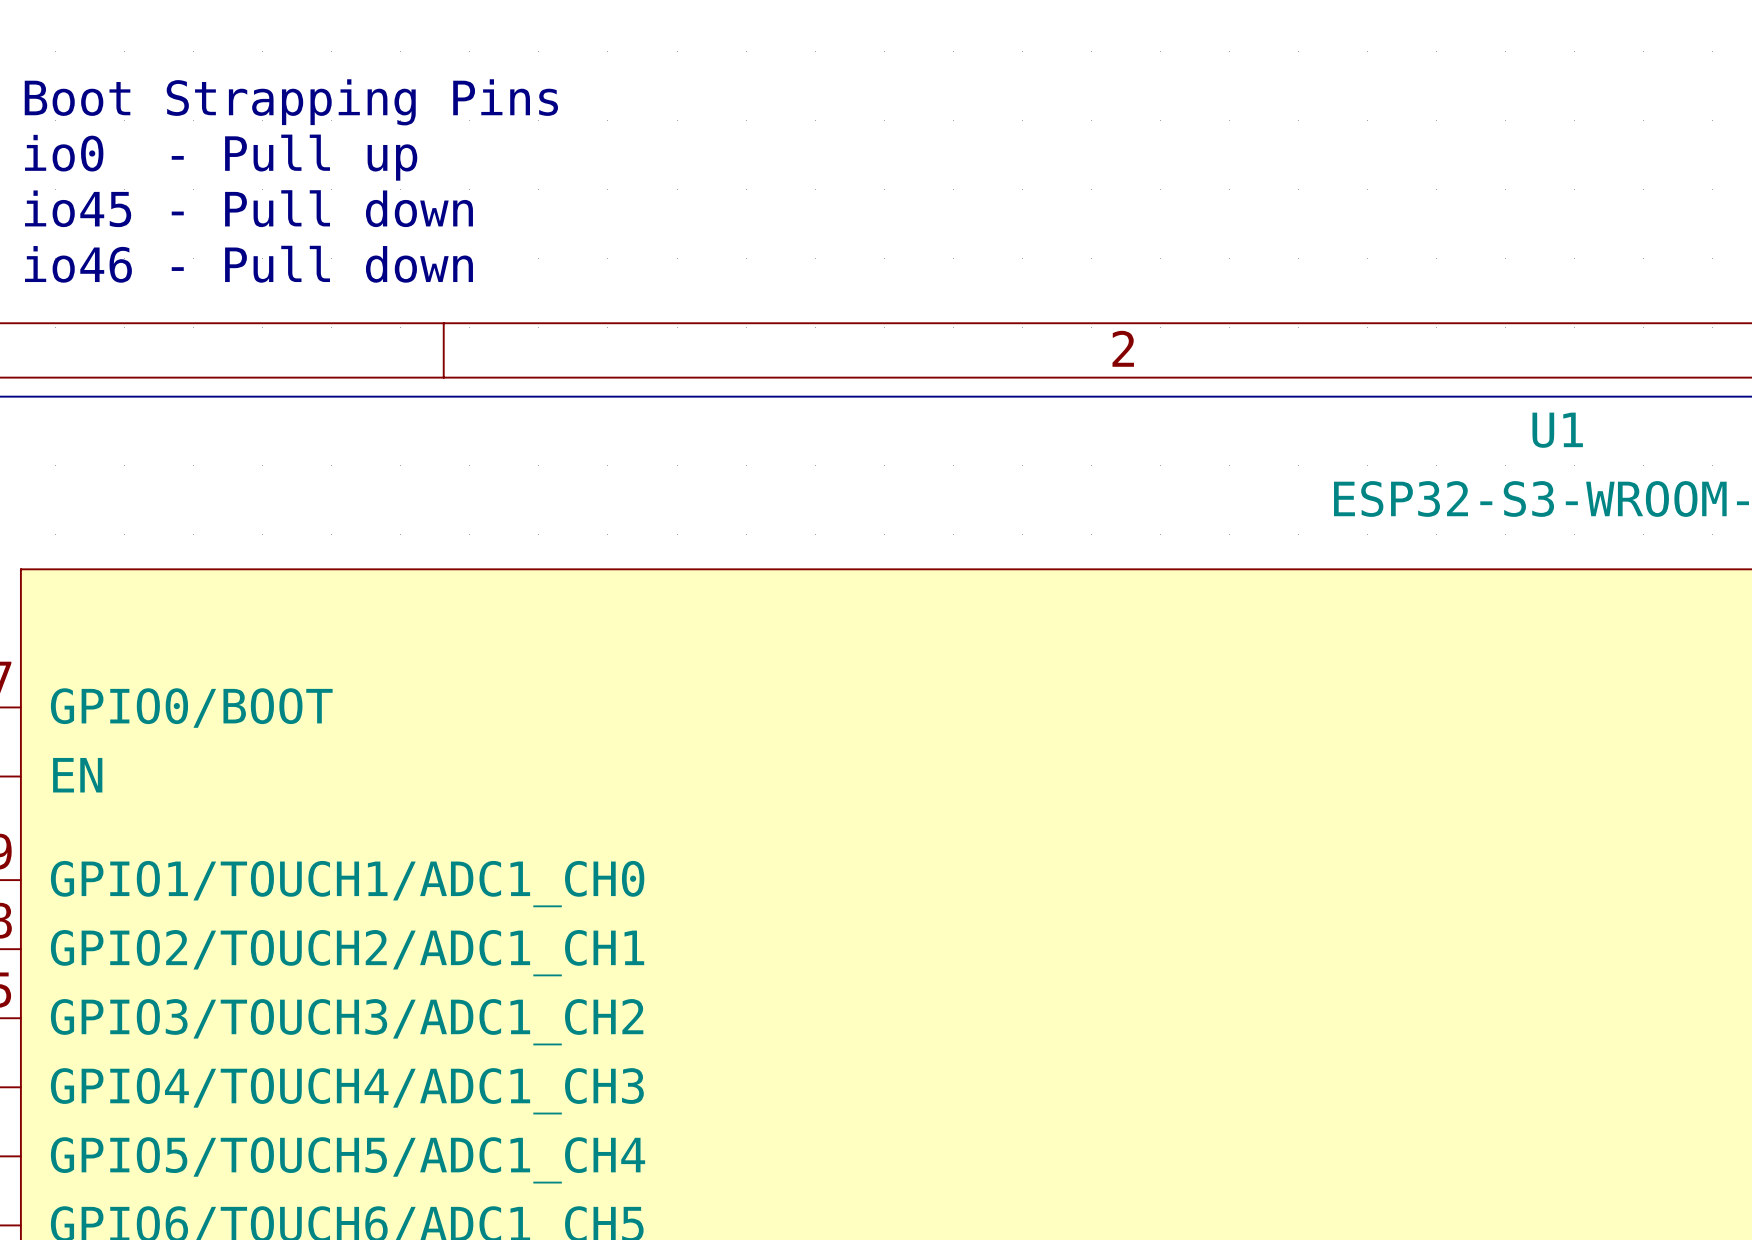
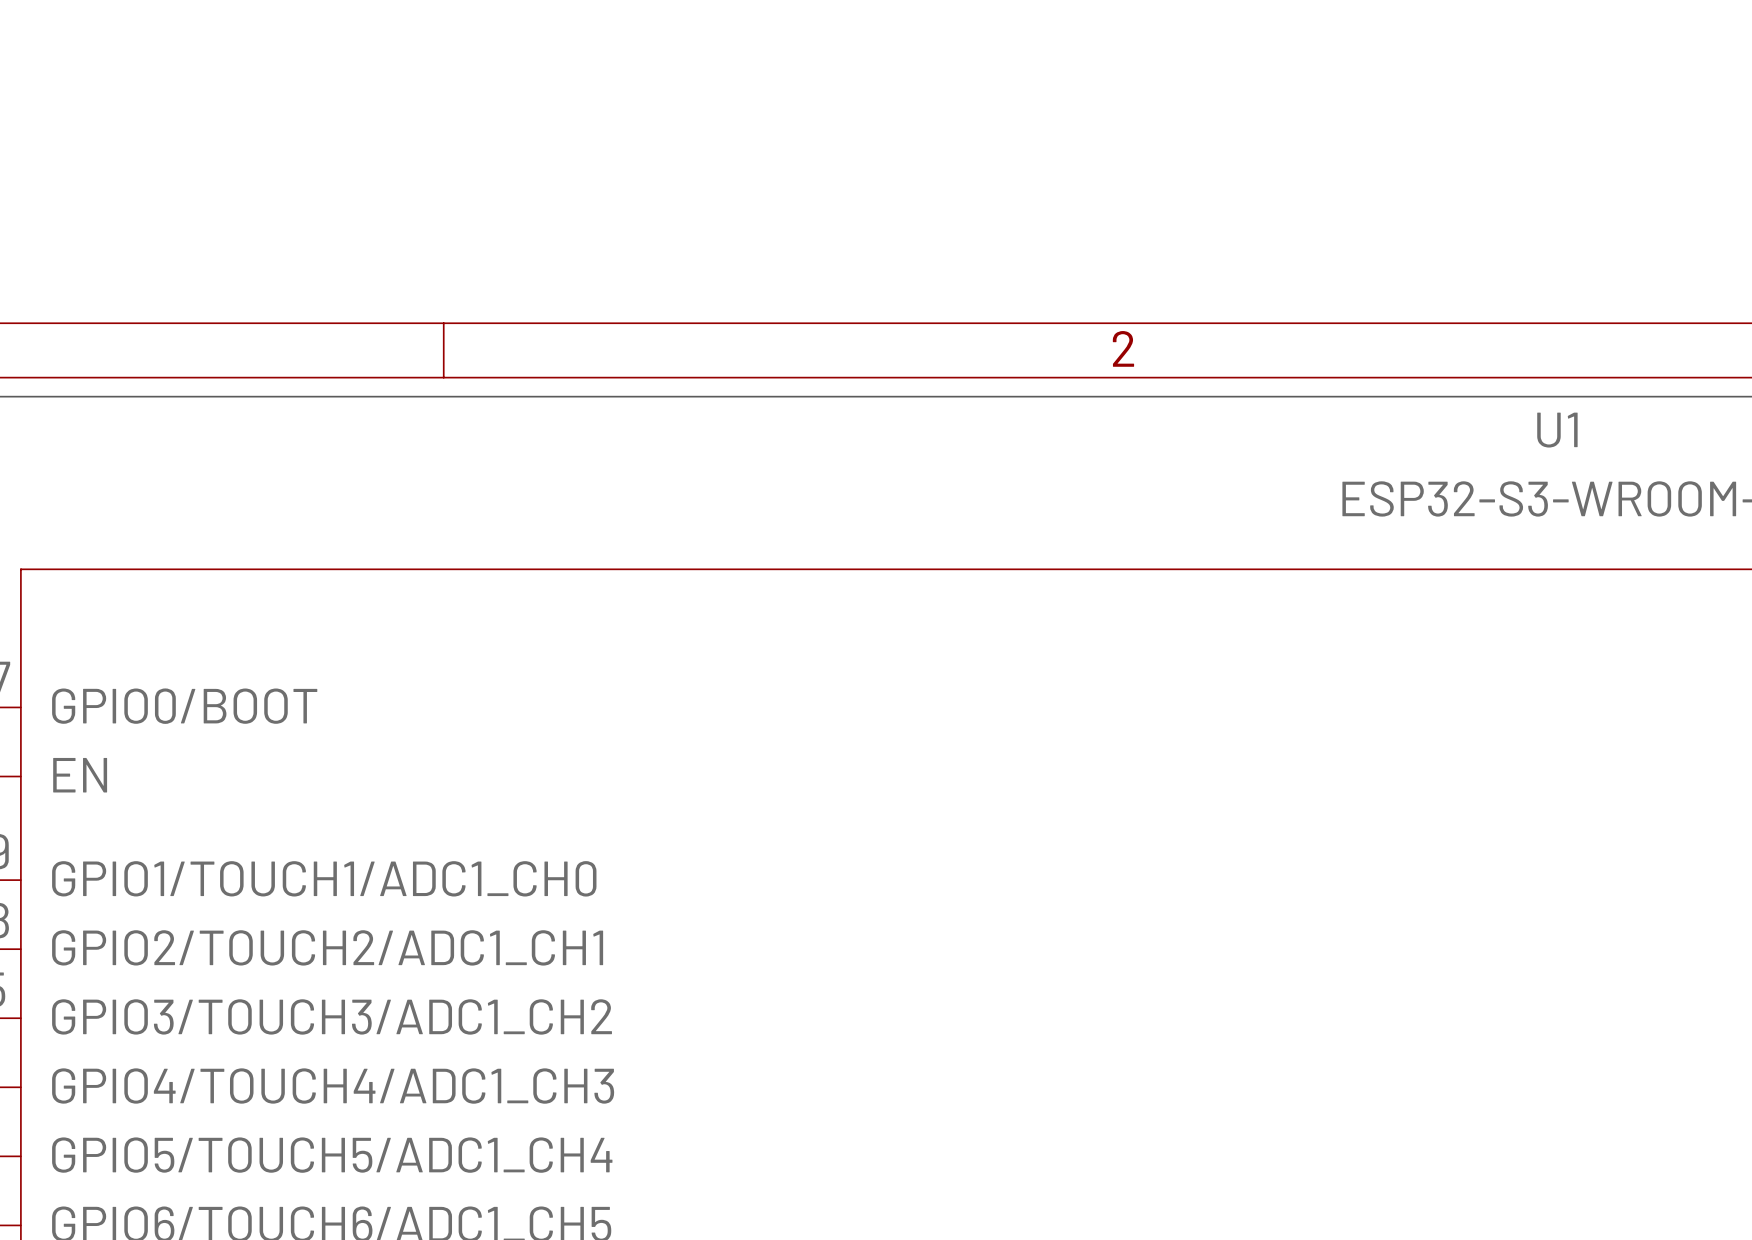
text: Boot Strapping Pins (291, 102) -> none
text: io0 - Pull up (221, 157) -> none
text: io45 - Pull down (248, 208) -> none
text: io46 - Pull down (248, 264) -> none

